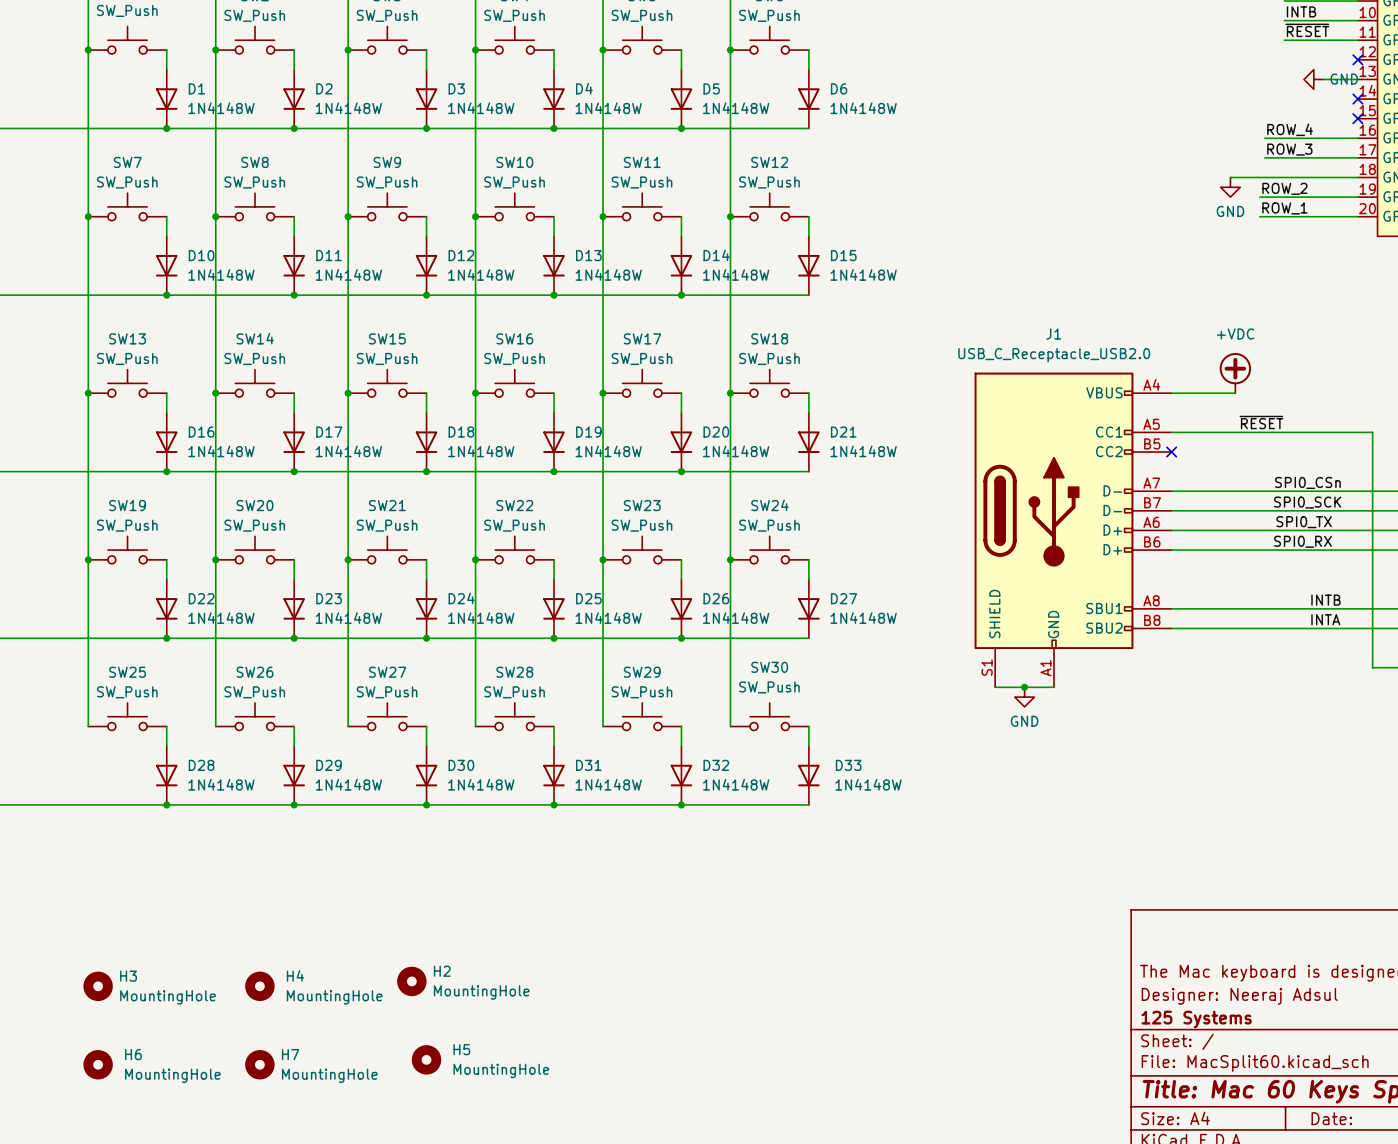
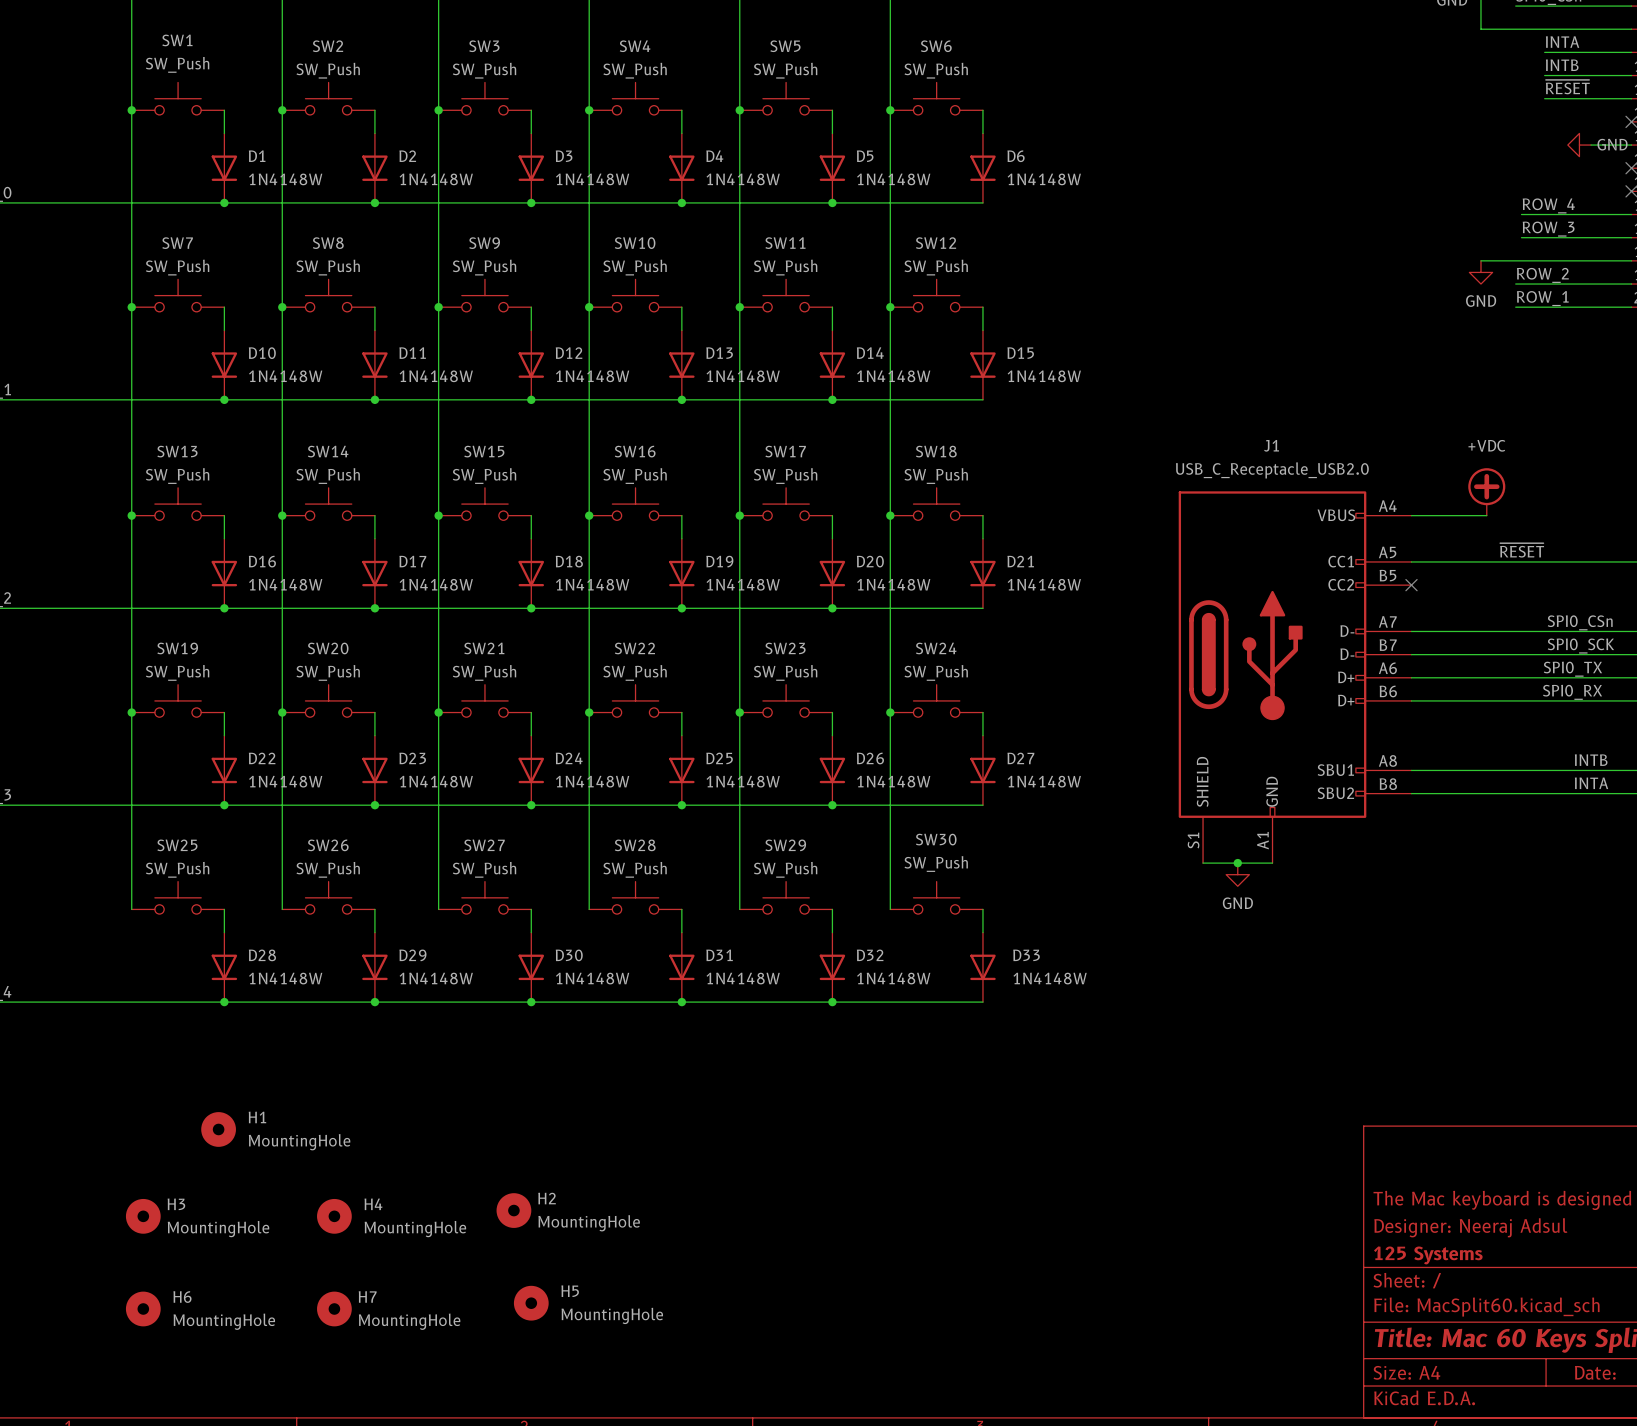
H1: none -> MountingHole (218, 1129)

